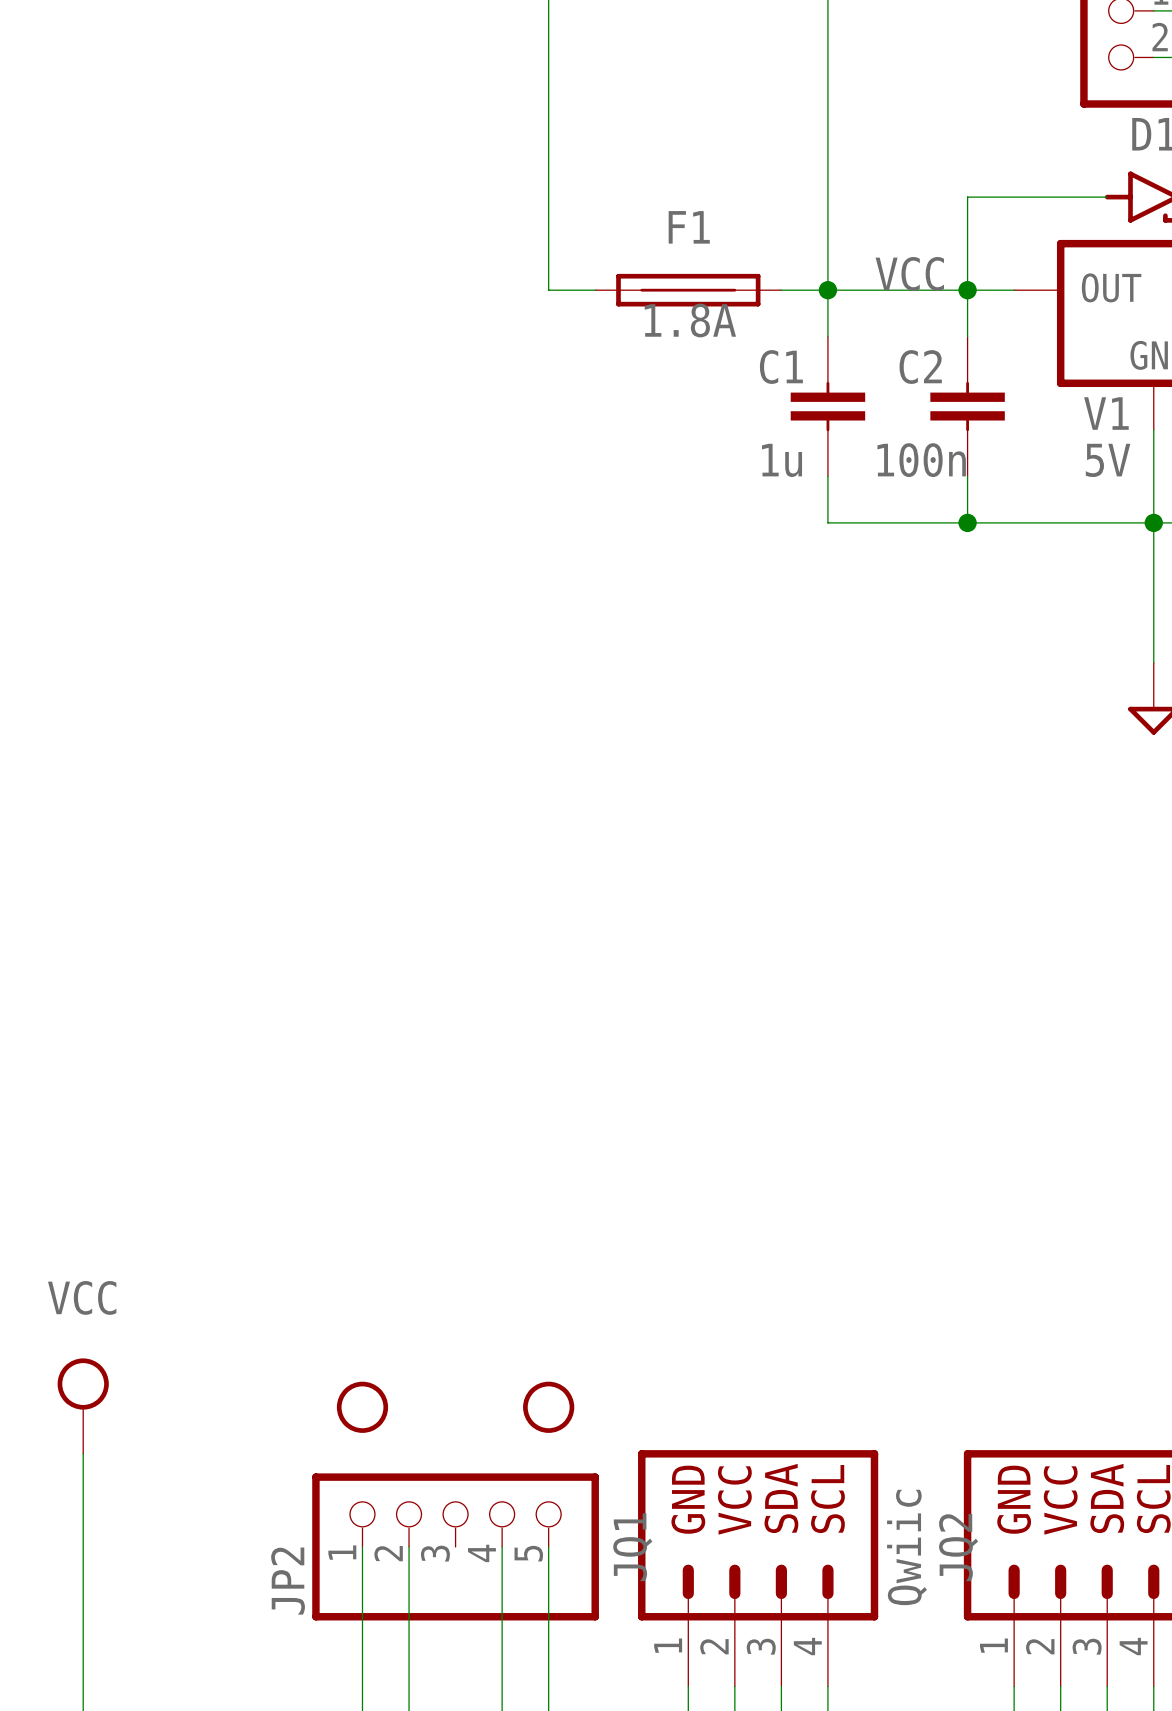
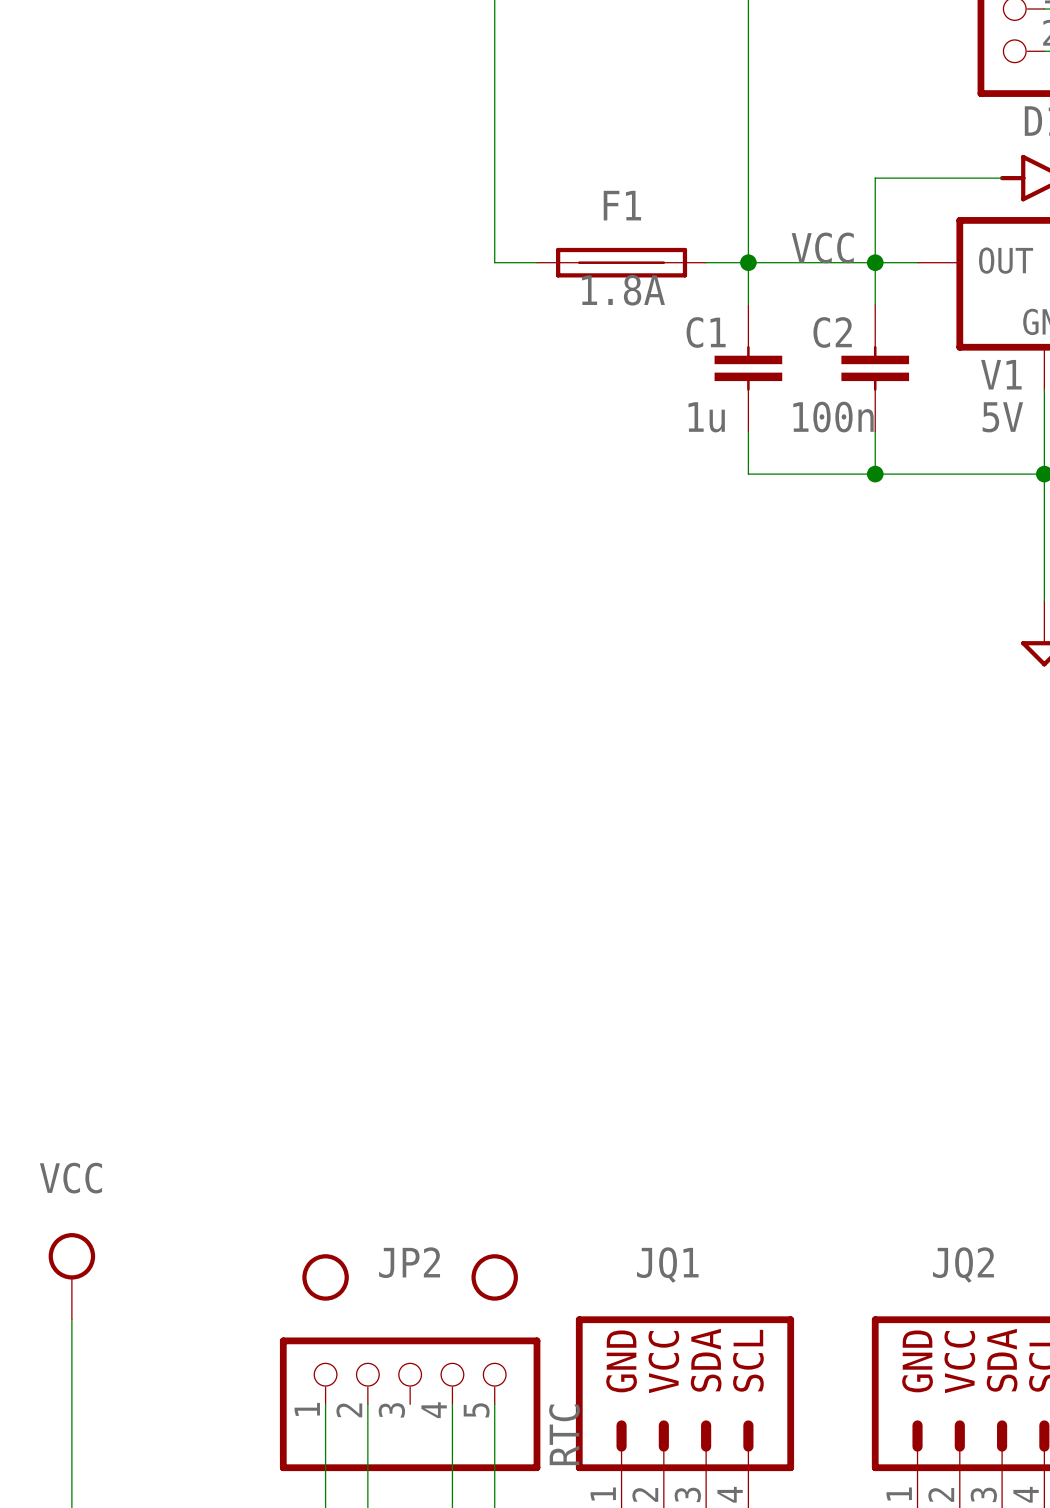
JQ1 name rotation: 0° (632, 1547) -> 90° clockwise (667, 1265)
JQ1 name position: JQ1 (632, 1547) -> JQ1 (667, 1265)
JQ1 value: Qwiic (907, 1547) -> none
JQ2 name rotation: 0° (958, 1547) -> 90° clockwise (963, 1265)
JQ2 name position: JQ2 (958, 1547) -> JQ2 (963, 1265)
JP2 value: none -> RTC (564, 1434)
JP2 name rotation: 0° (288, 1581) -> 90° clockwise (409, 1262)
JP2 name position: JP2 (288, 1581) -> JP2 (409, 1262)

